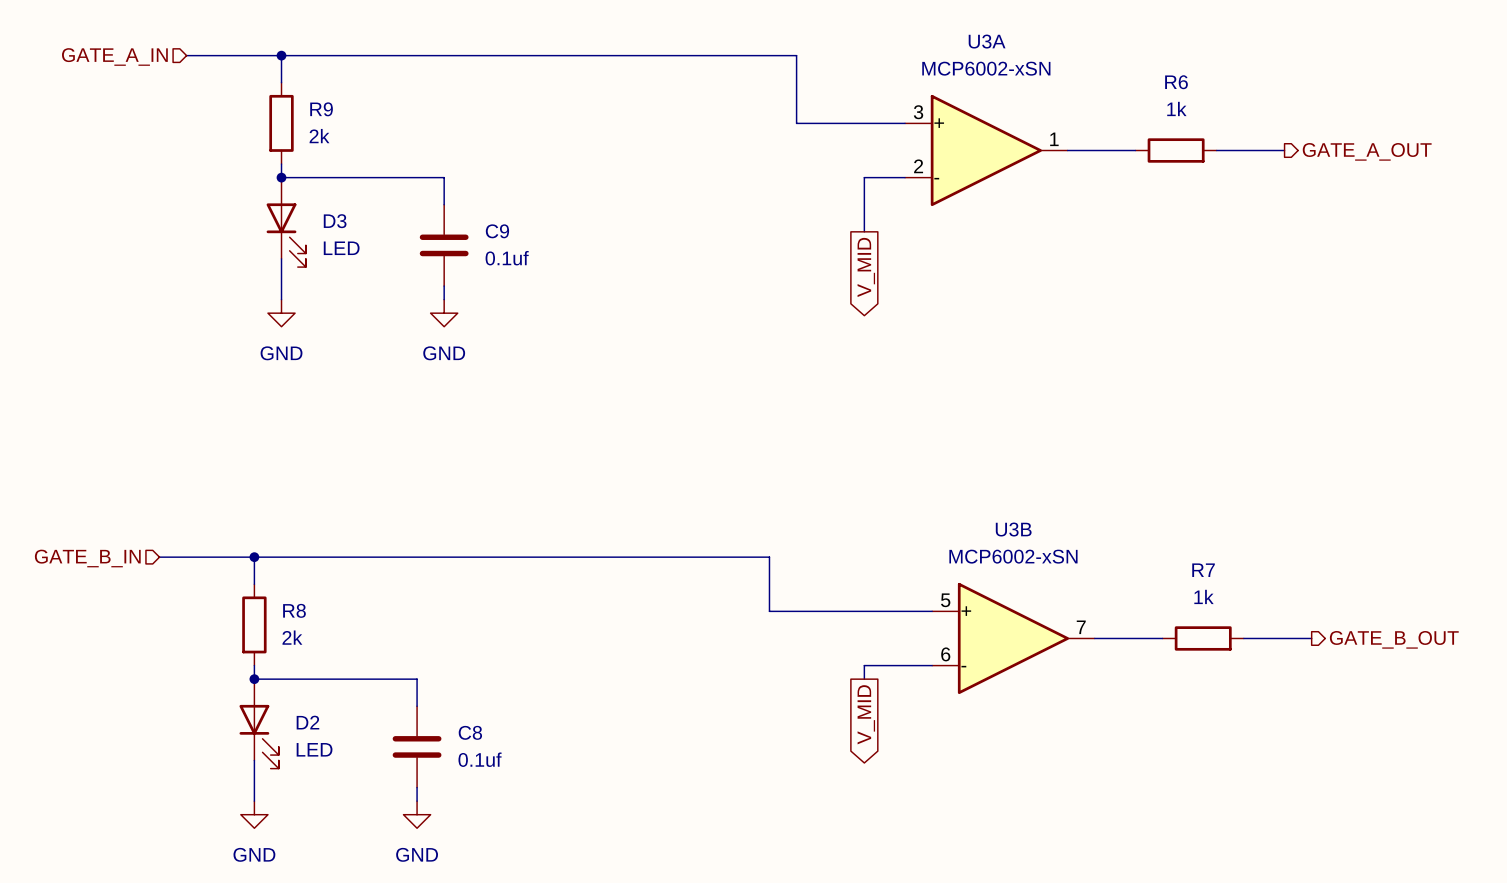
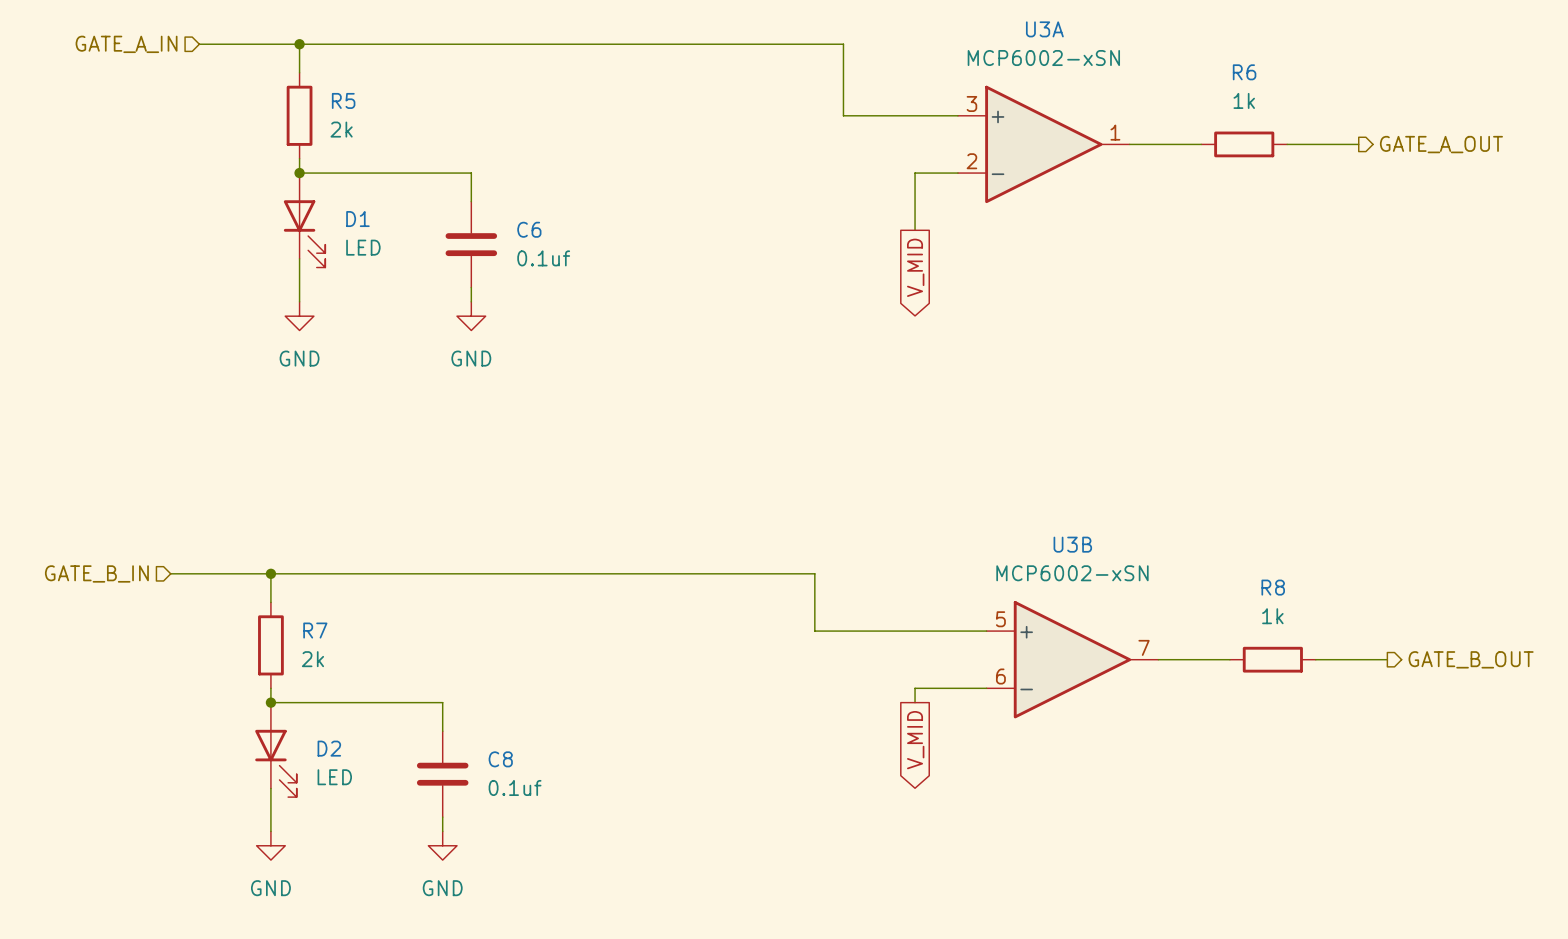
R9 name: R9 (321, 109) -> R5 (343, 100)
D3 name: D3 (335, 221) -> D1 (357, 219)
C9 name: C9 (497, 231) -> C6 (529, 229)
R7 name: R7 (1203, 570) -> R8 (1273, 587)
R8 name: R8 (294, 610) -> R7 (315, 630)

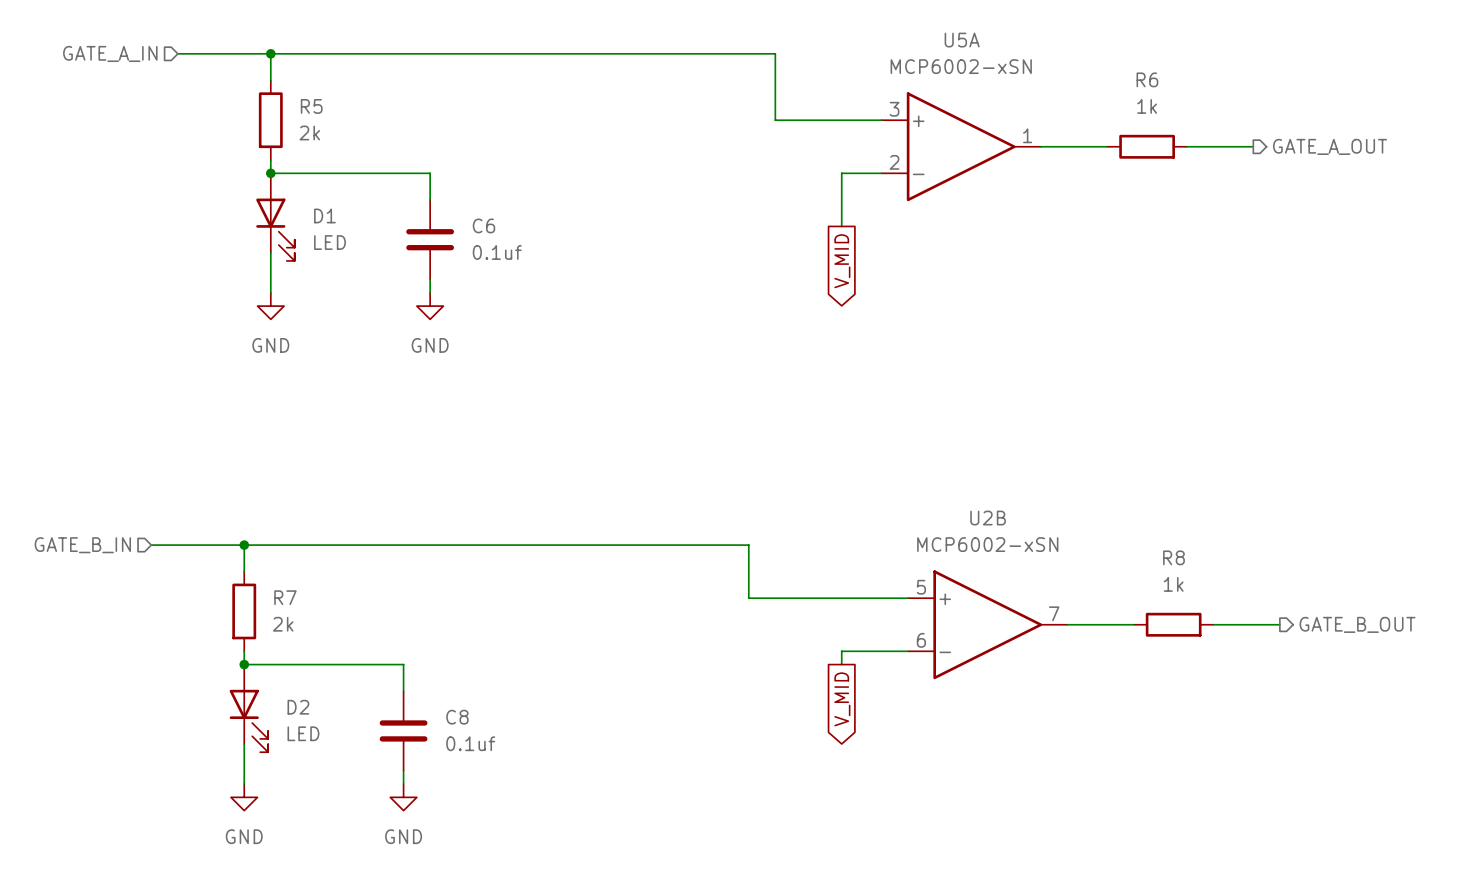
U3A name: U3A (1044, 29) -> U5A (962, 40)
U3B name: U3B (1072, 544) -> U2B (988, 518)

